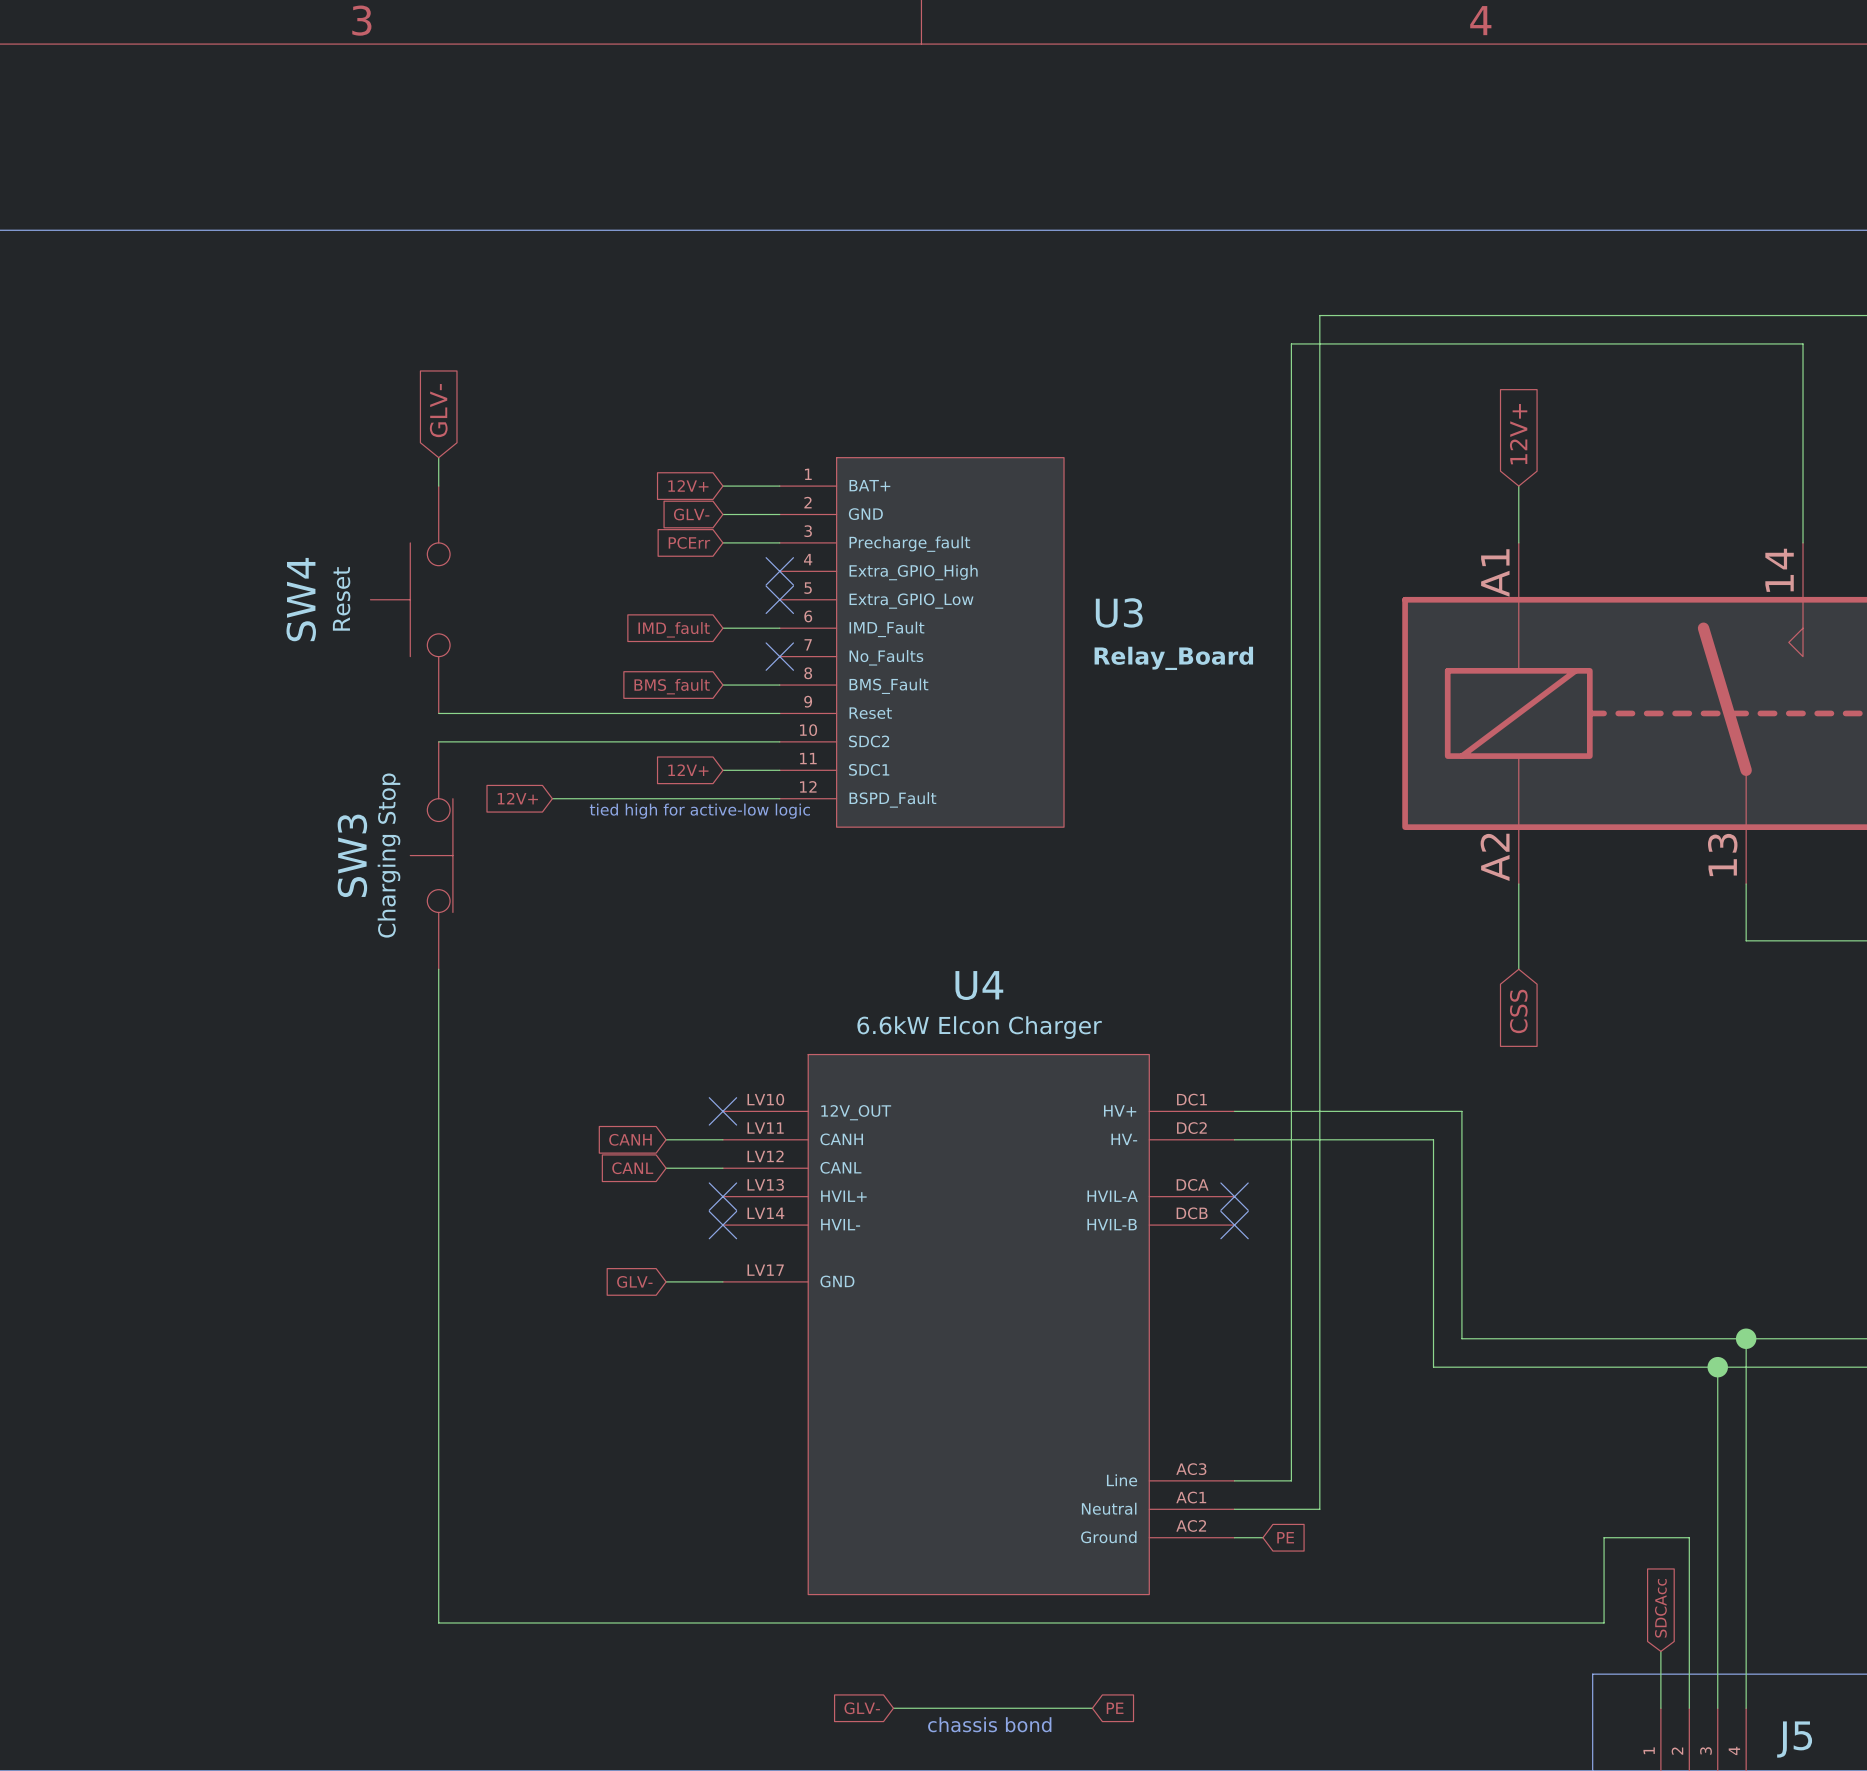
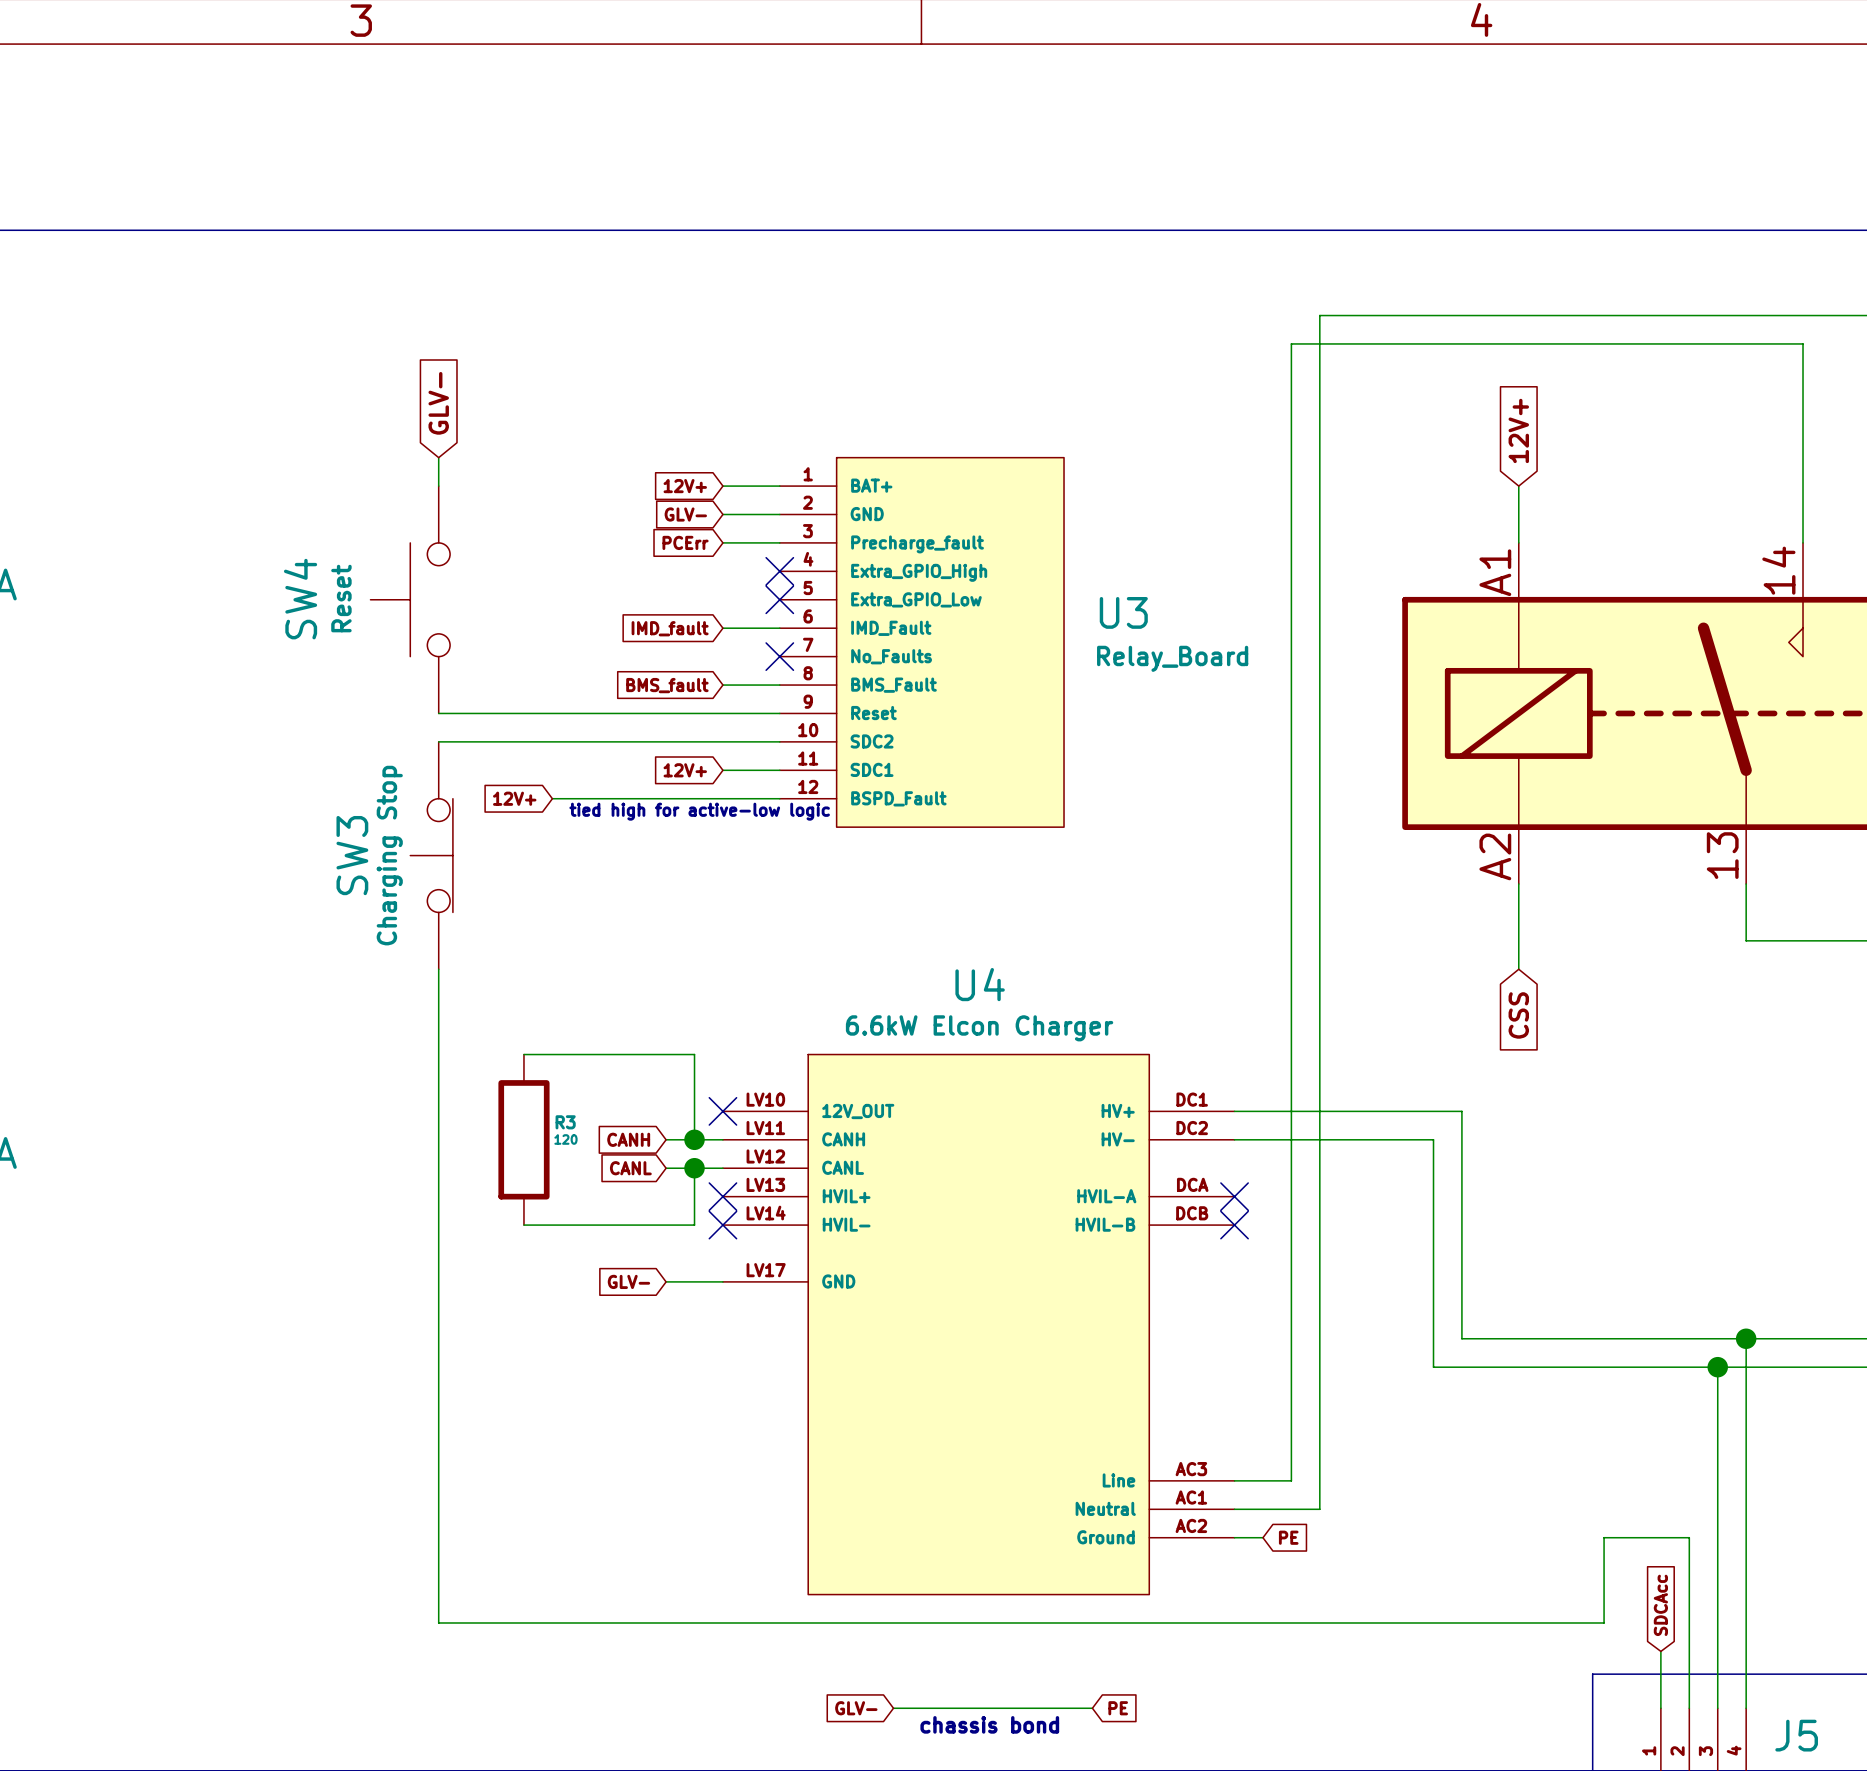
wire: none -> (523, 1054) (694, 1054) (694, 1139)
R3: none -> 120 (523, 1139)
junction: none -> (694, 1139)
wire: none -> (694, 1168) (694, 1225) (523, 1225)
junction: none -> (694, 1168)

